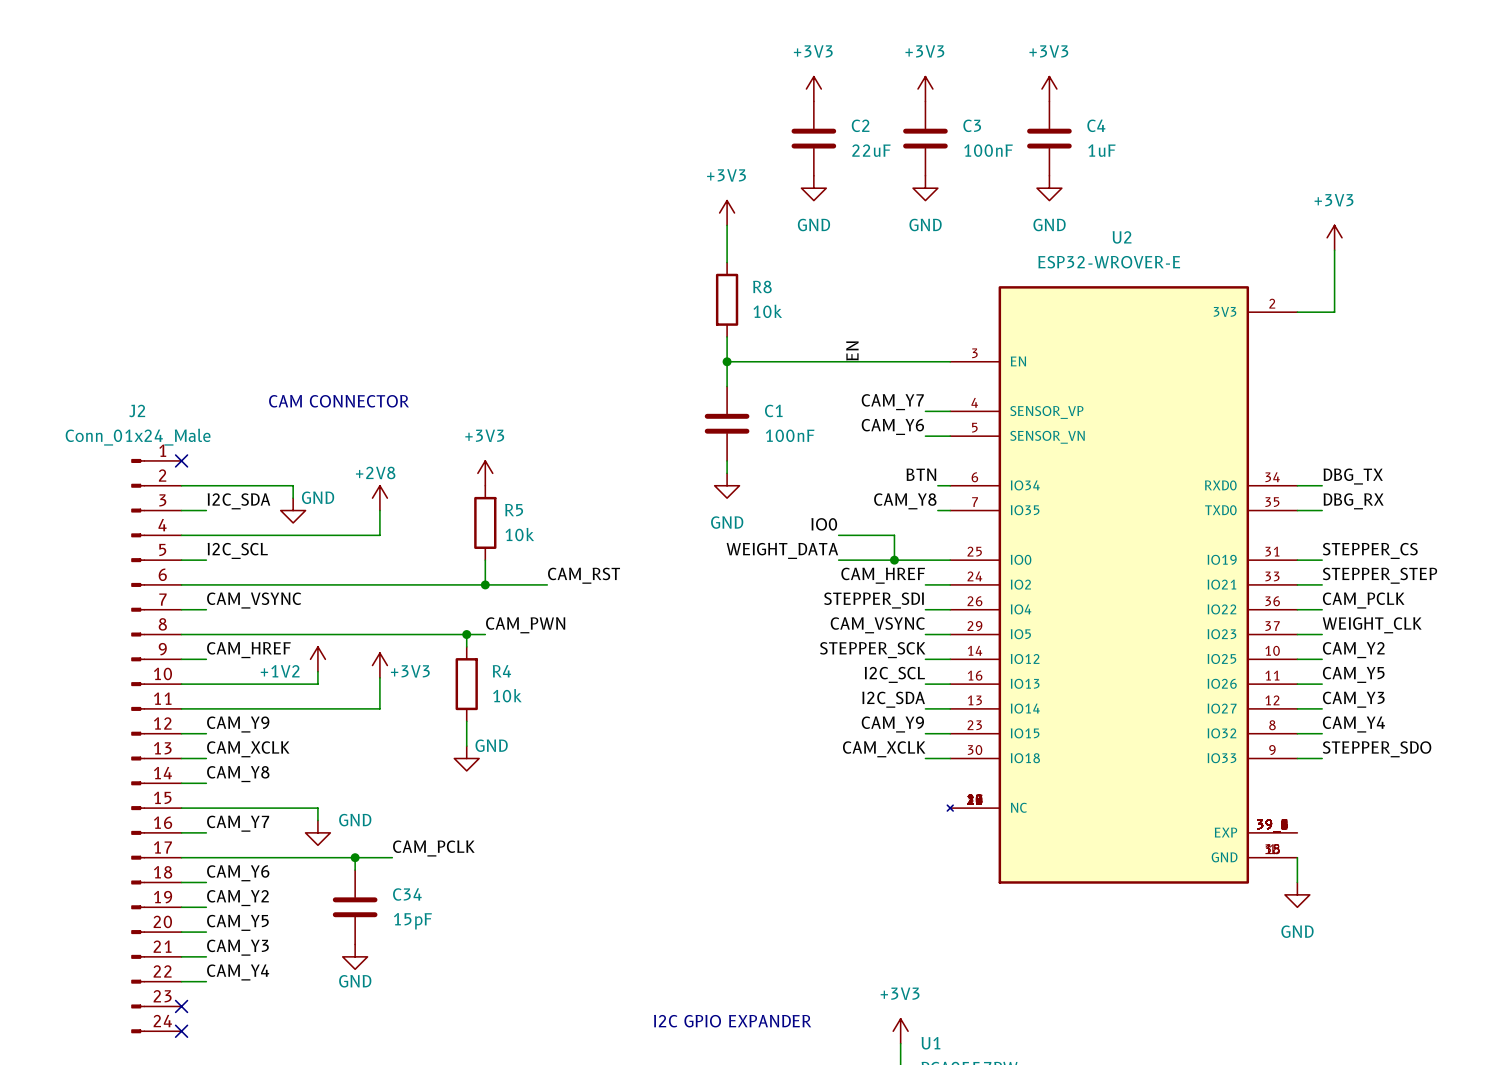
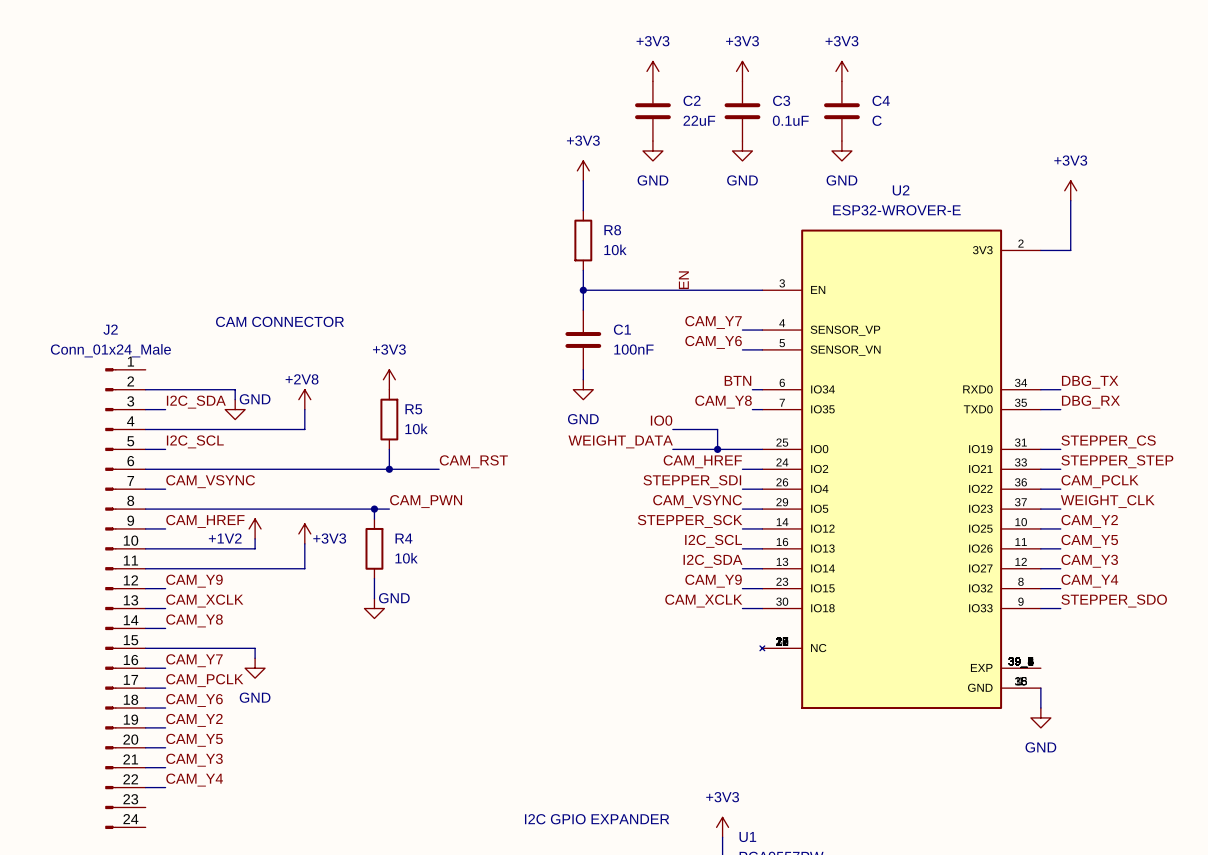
C3 value: 100nF (988, 150) -> 0.1uF (790, 120)
C4 value: 1uF (1101, 150) -> C (877, 120)
no-connect mark: (181, 460) -> none
power symbol text position: GND (355, 820) -> GND (255, 697)
label position: CAM_PCLK (433, 848) -> CAM_PCLK (204, 680)
wire: (206, 857) (392, 857) -> none
wire: (355, 857) (355, 870) -> none
junction: (355, 857) -> none
C34: 15pF (355, 907) -> none
power symbol: GND (355, 956) -> none
no-connect mark: (181, 1006) -> none
no-connect mark: (181, 1031) -> none

